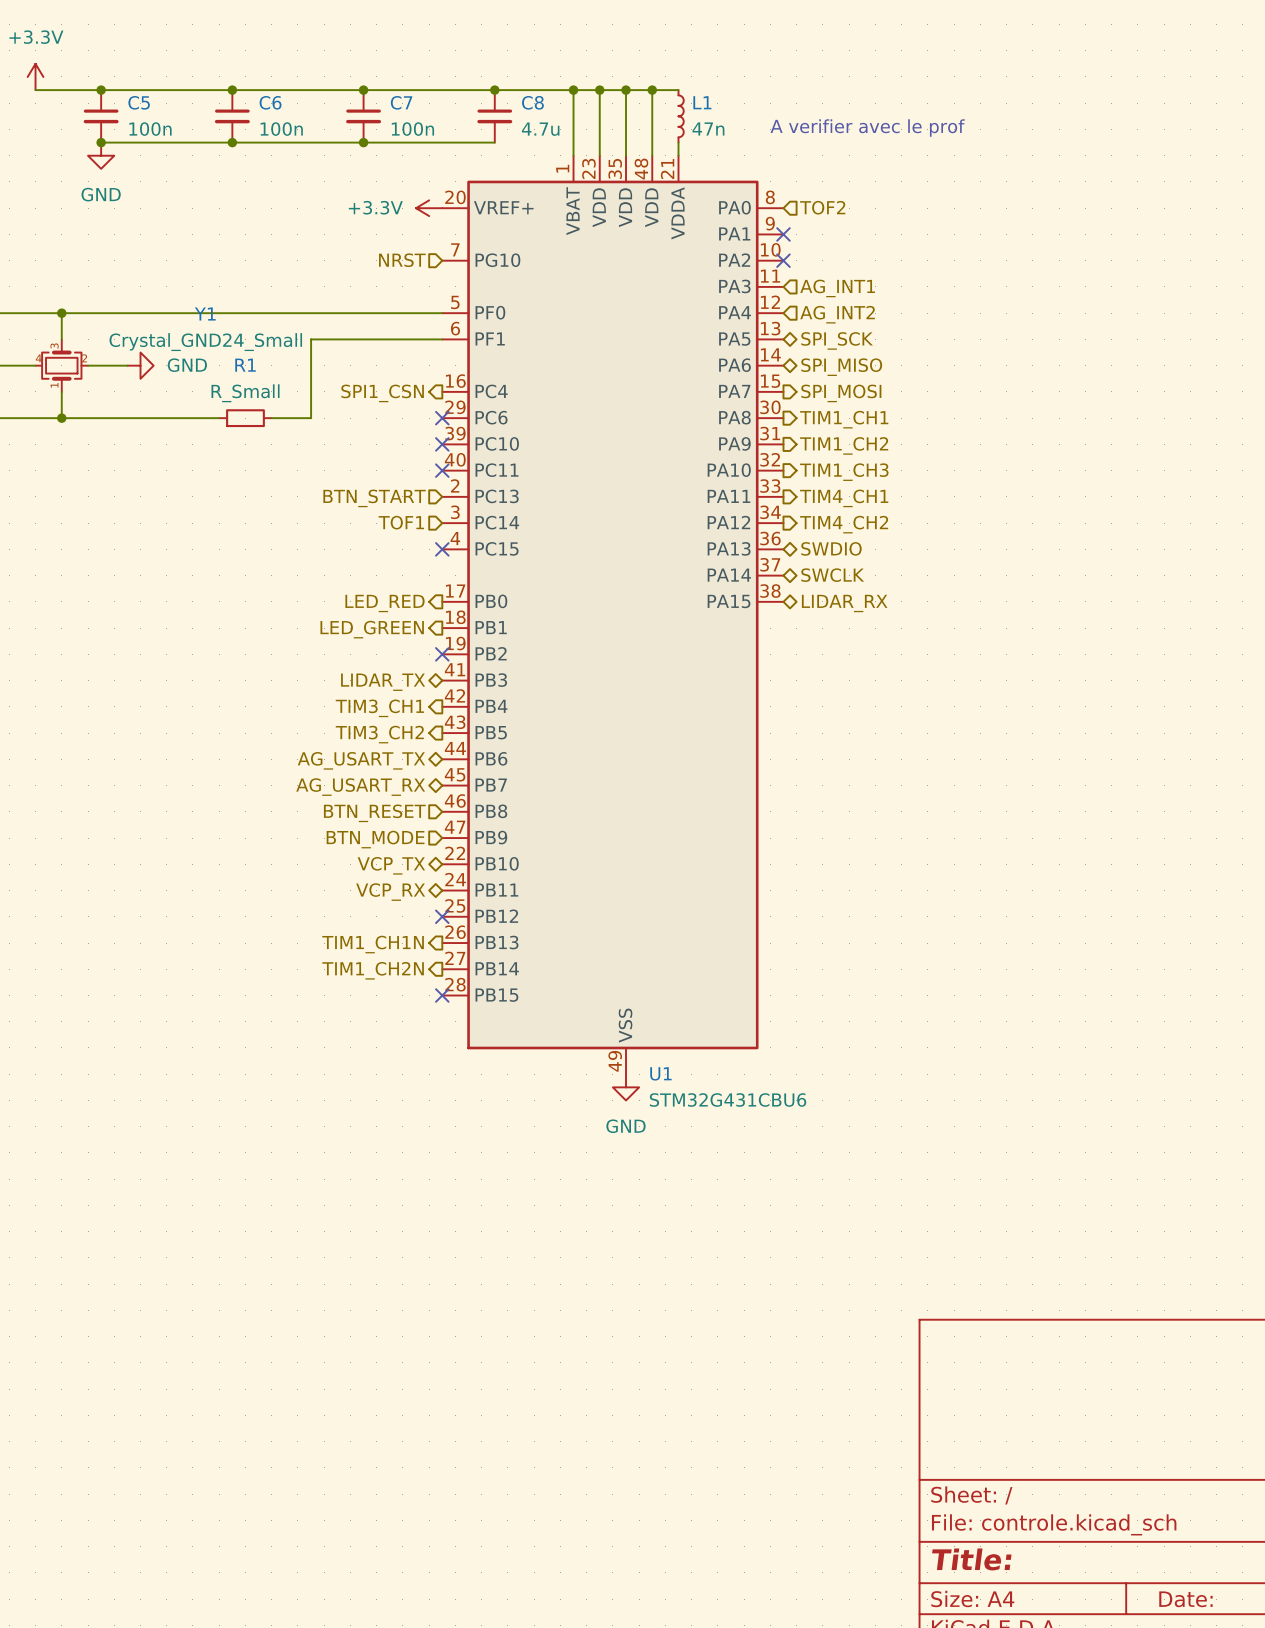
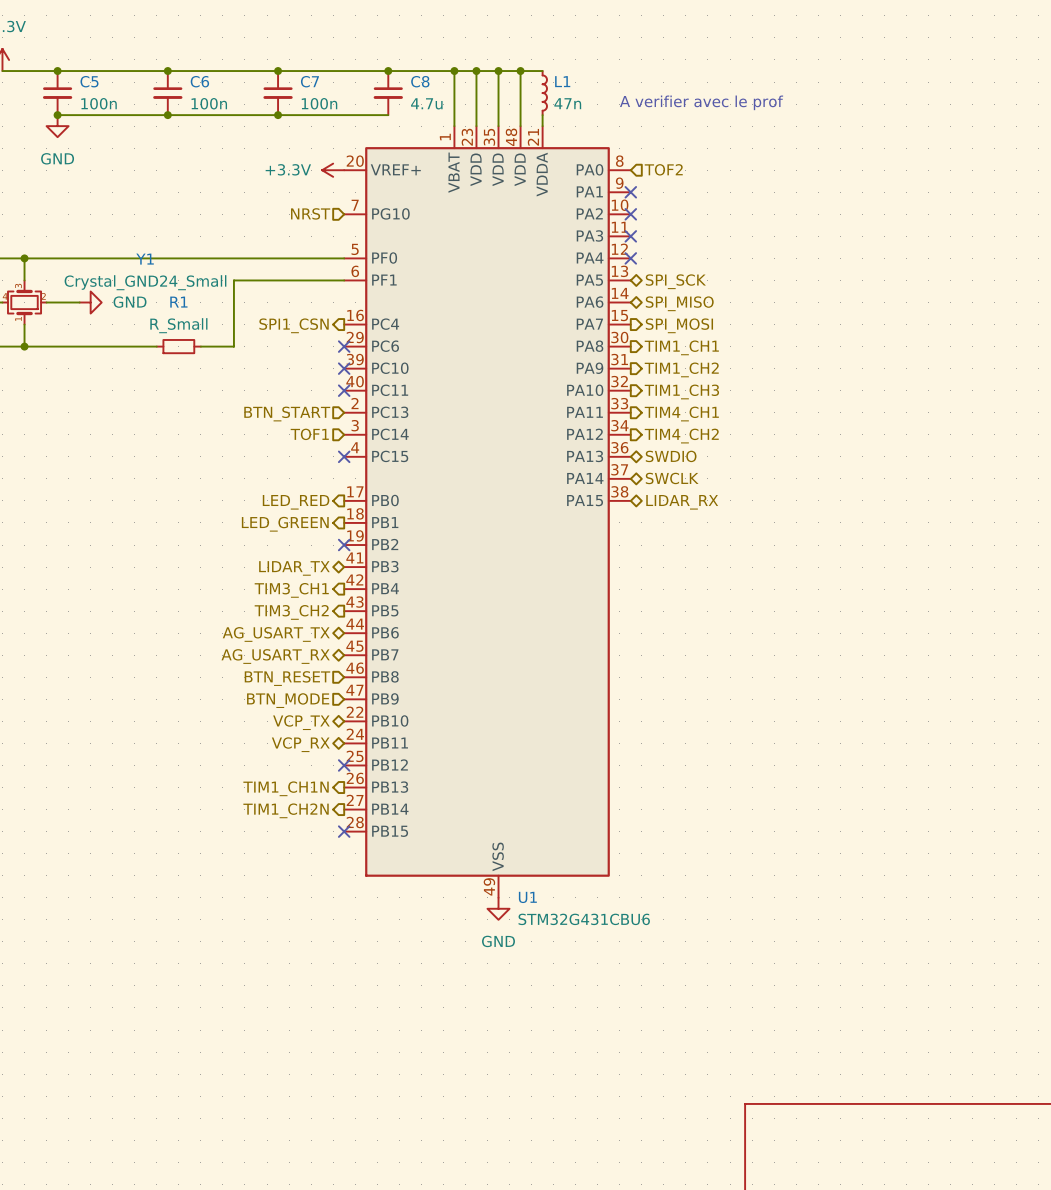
no-connect mark: none -> (630, 236)
hierarchical label: AG_INT1 (837, 288) -> none
no-connect mark: none -> (630, 258)
hierarchical label: AG_INT2 (837, 314) -> none

